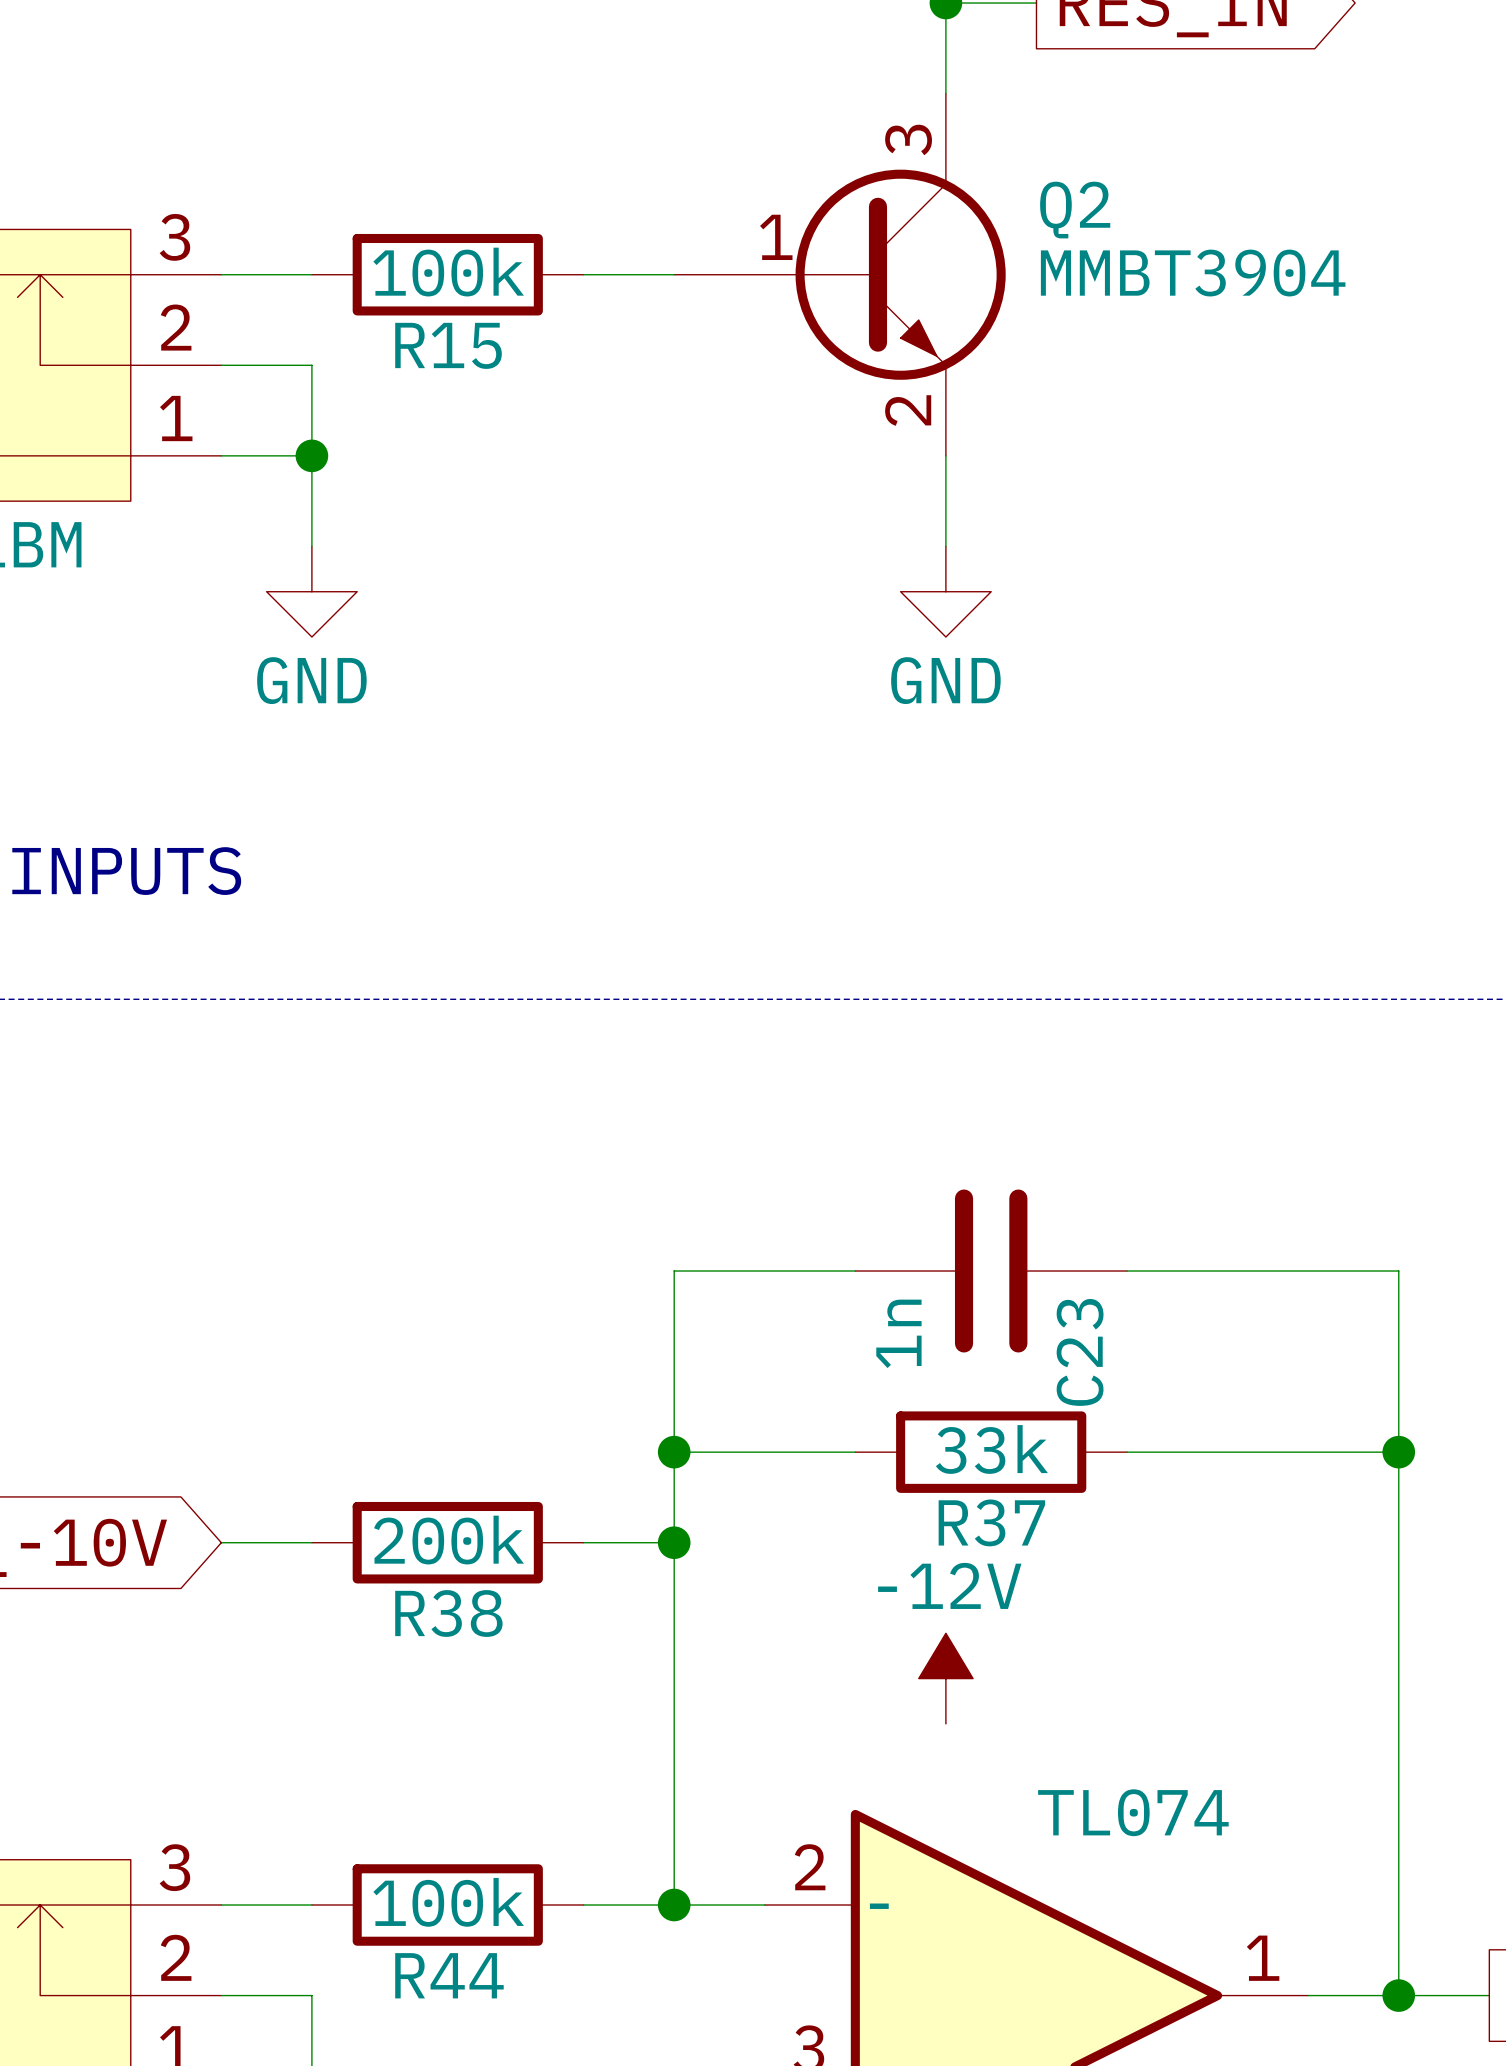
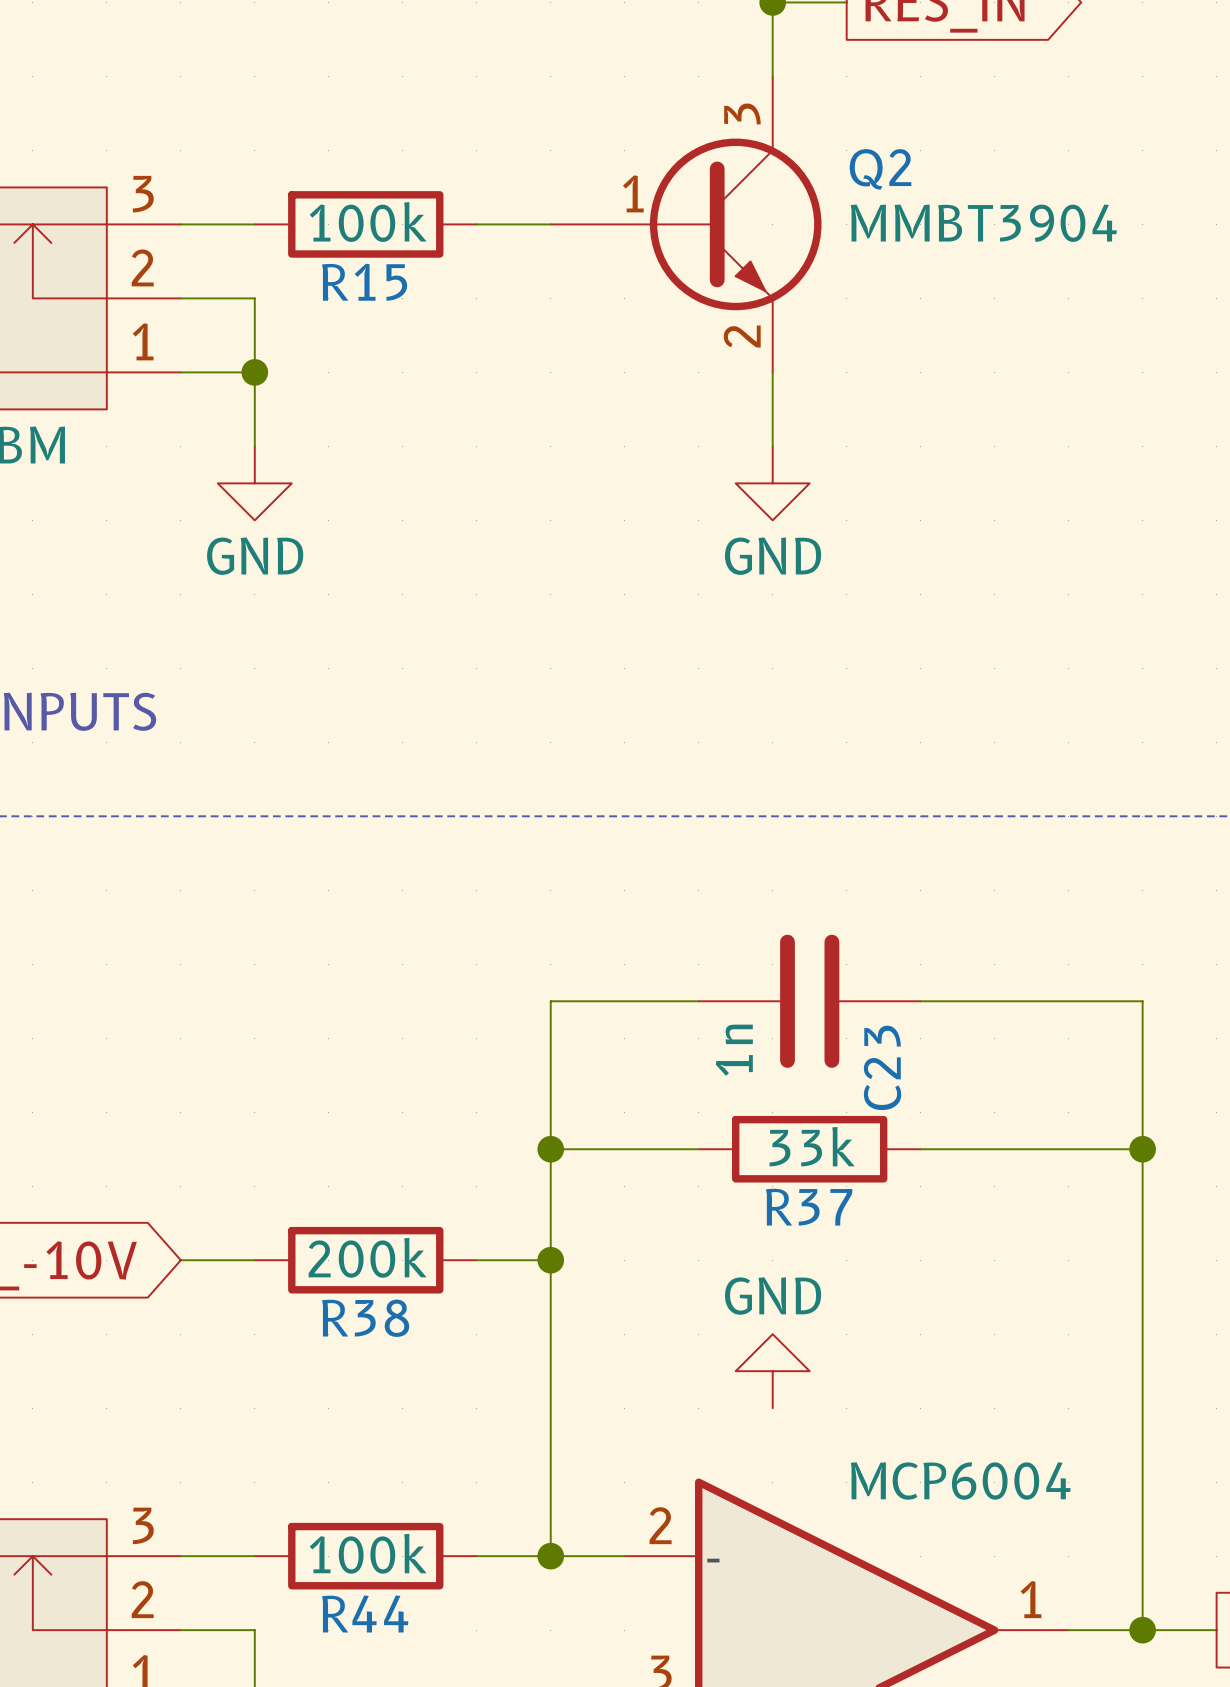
wire: (674, 1271) (855, 1271) -> (550, 1038) (550, 1001) (698, 1001)
C23 position: (991, 1271) -> (809, 1001)
wire: (1127, 1271) (1398, 1271) -> (920, 1001) (1142, 1001) (1142, 1038)
wire: (674, 1452) (855, 1452) -> (550, 1149) (698, 1149)
junction position: (674, 1452) -> (550, 1149)
R37 position: (991, 1452) -> (809, 1149)
wire: (1127, 1452) (1398, 1452) -> (920, 1149) (1142, 1149)
junction position: (1398, 1452) -> (1142, 1149)
power symbol: -12V (945, 1678) -> GND (772, 1371)
part value: TL074 (1133, 1812) -> MCP6004 (960, 1481)

